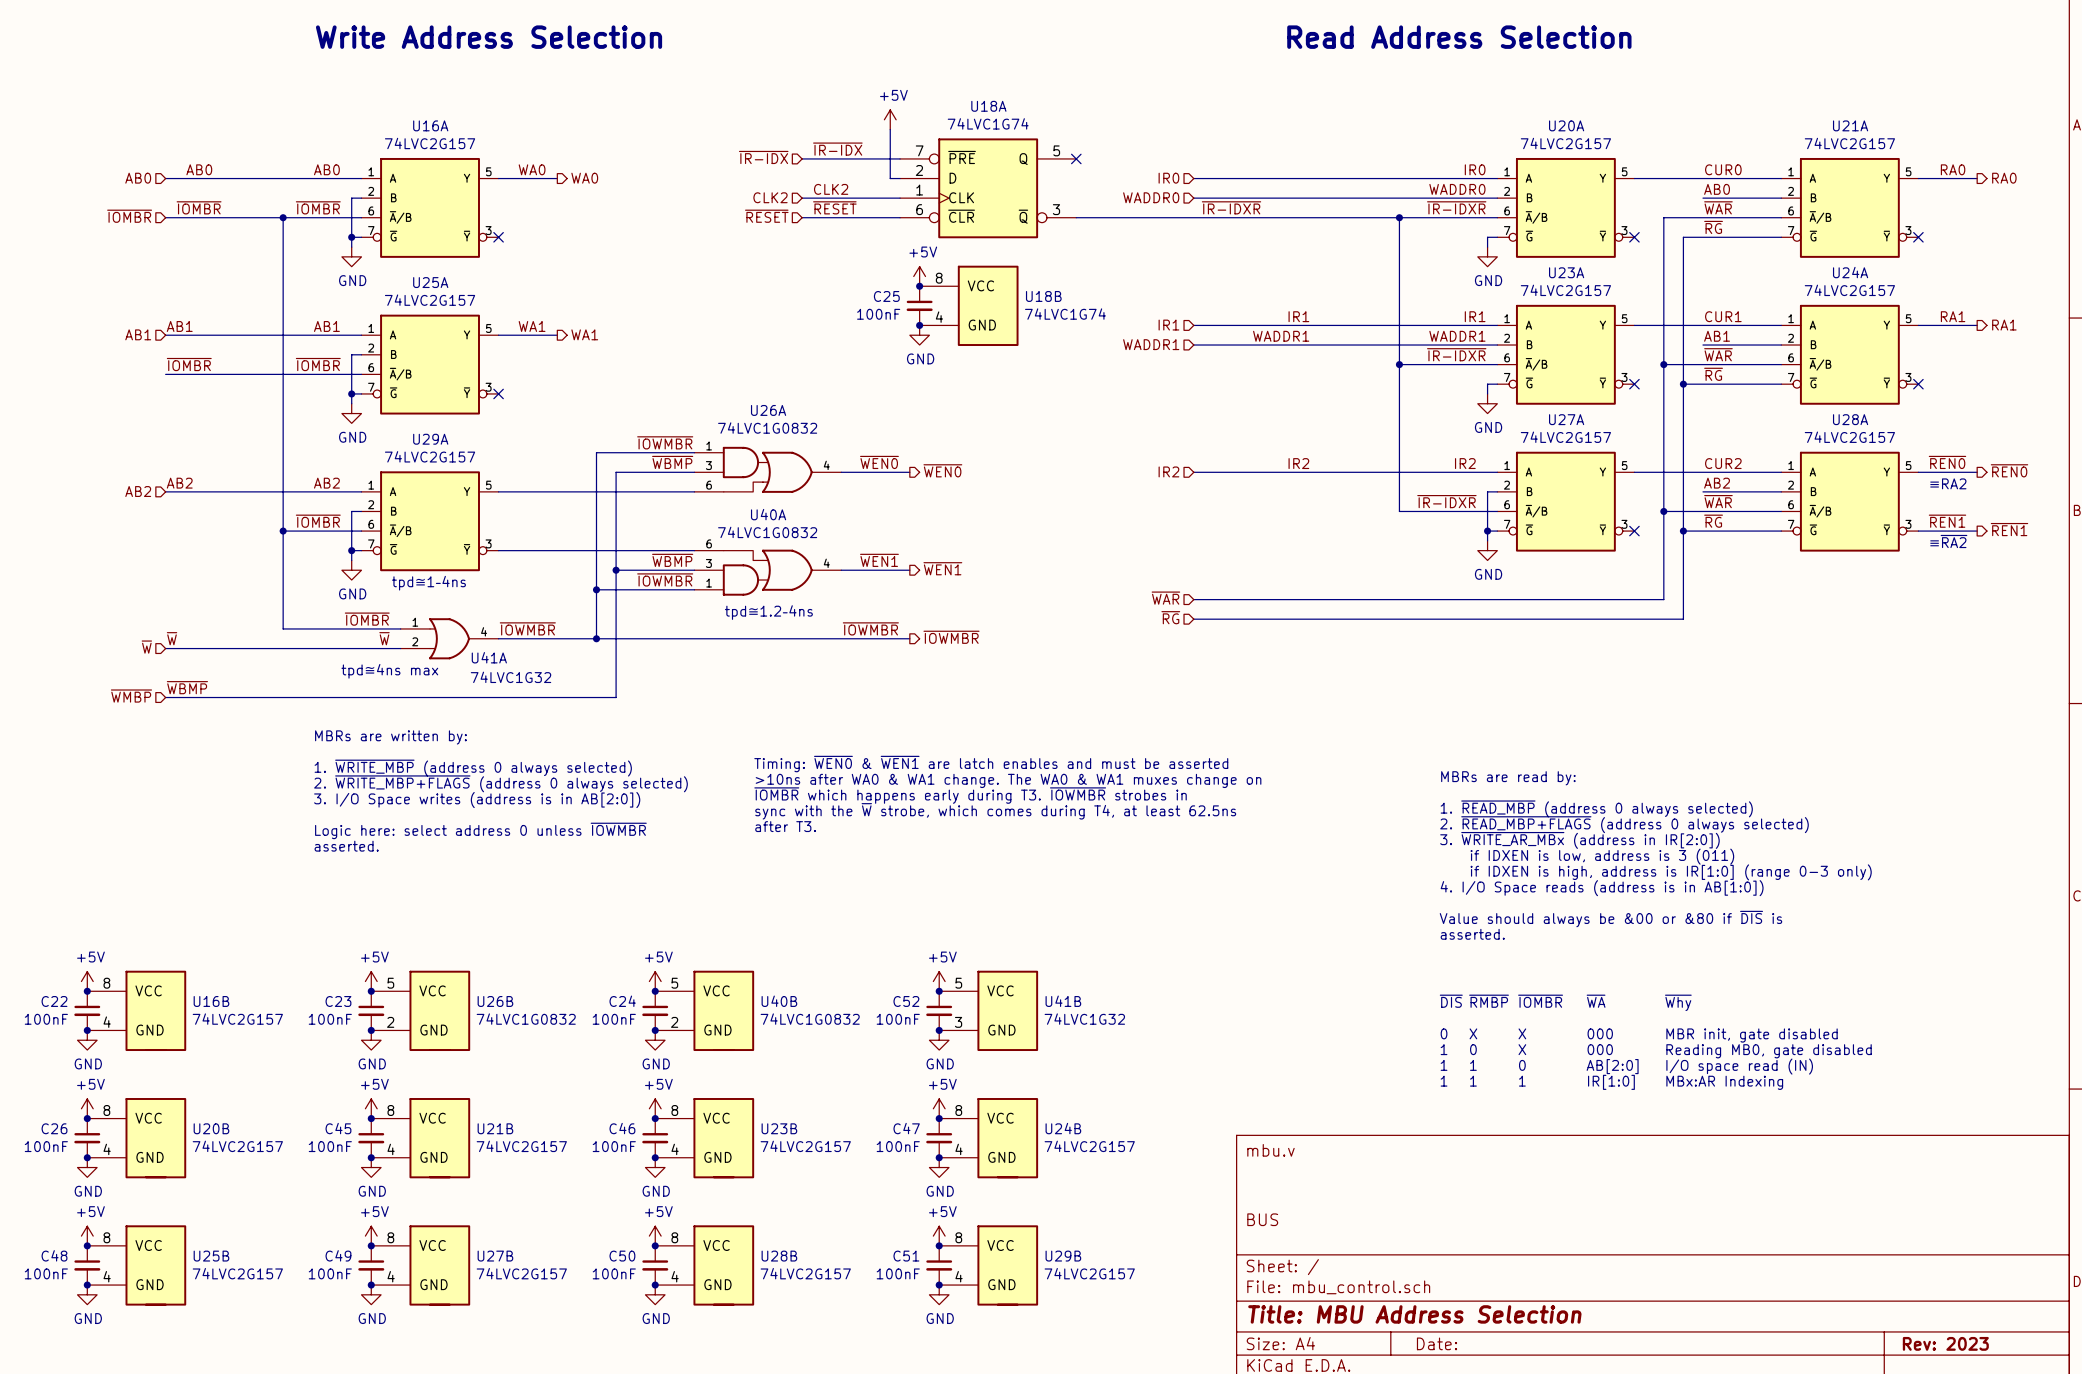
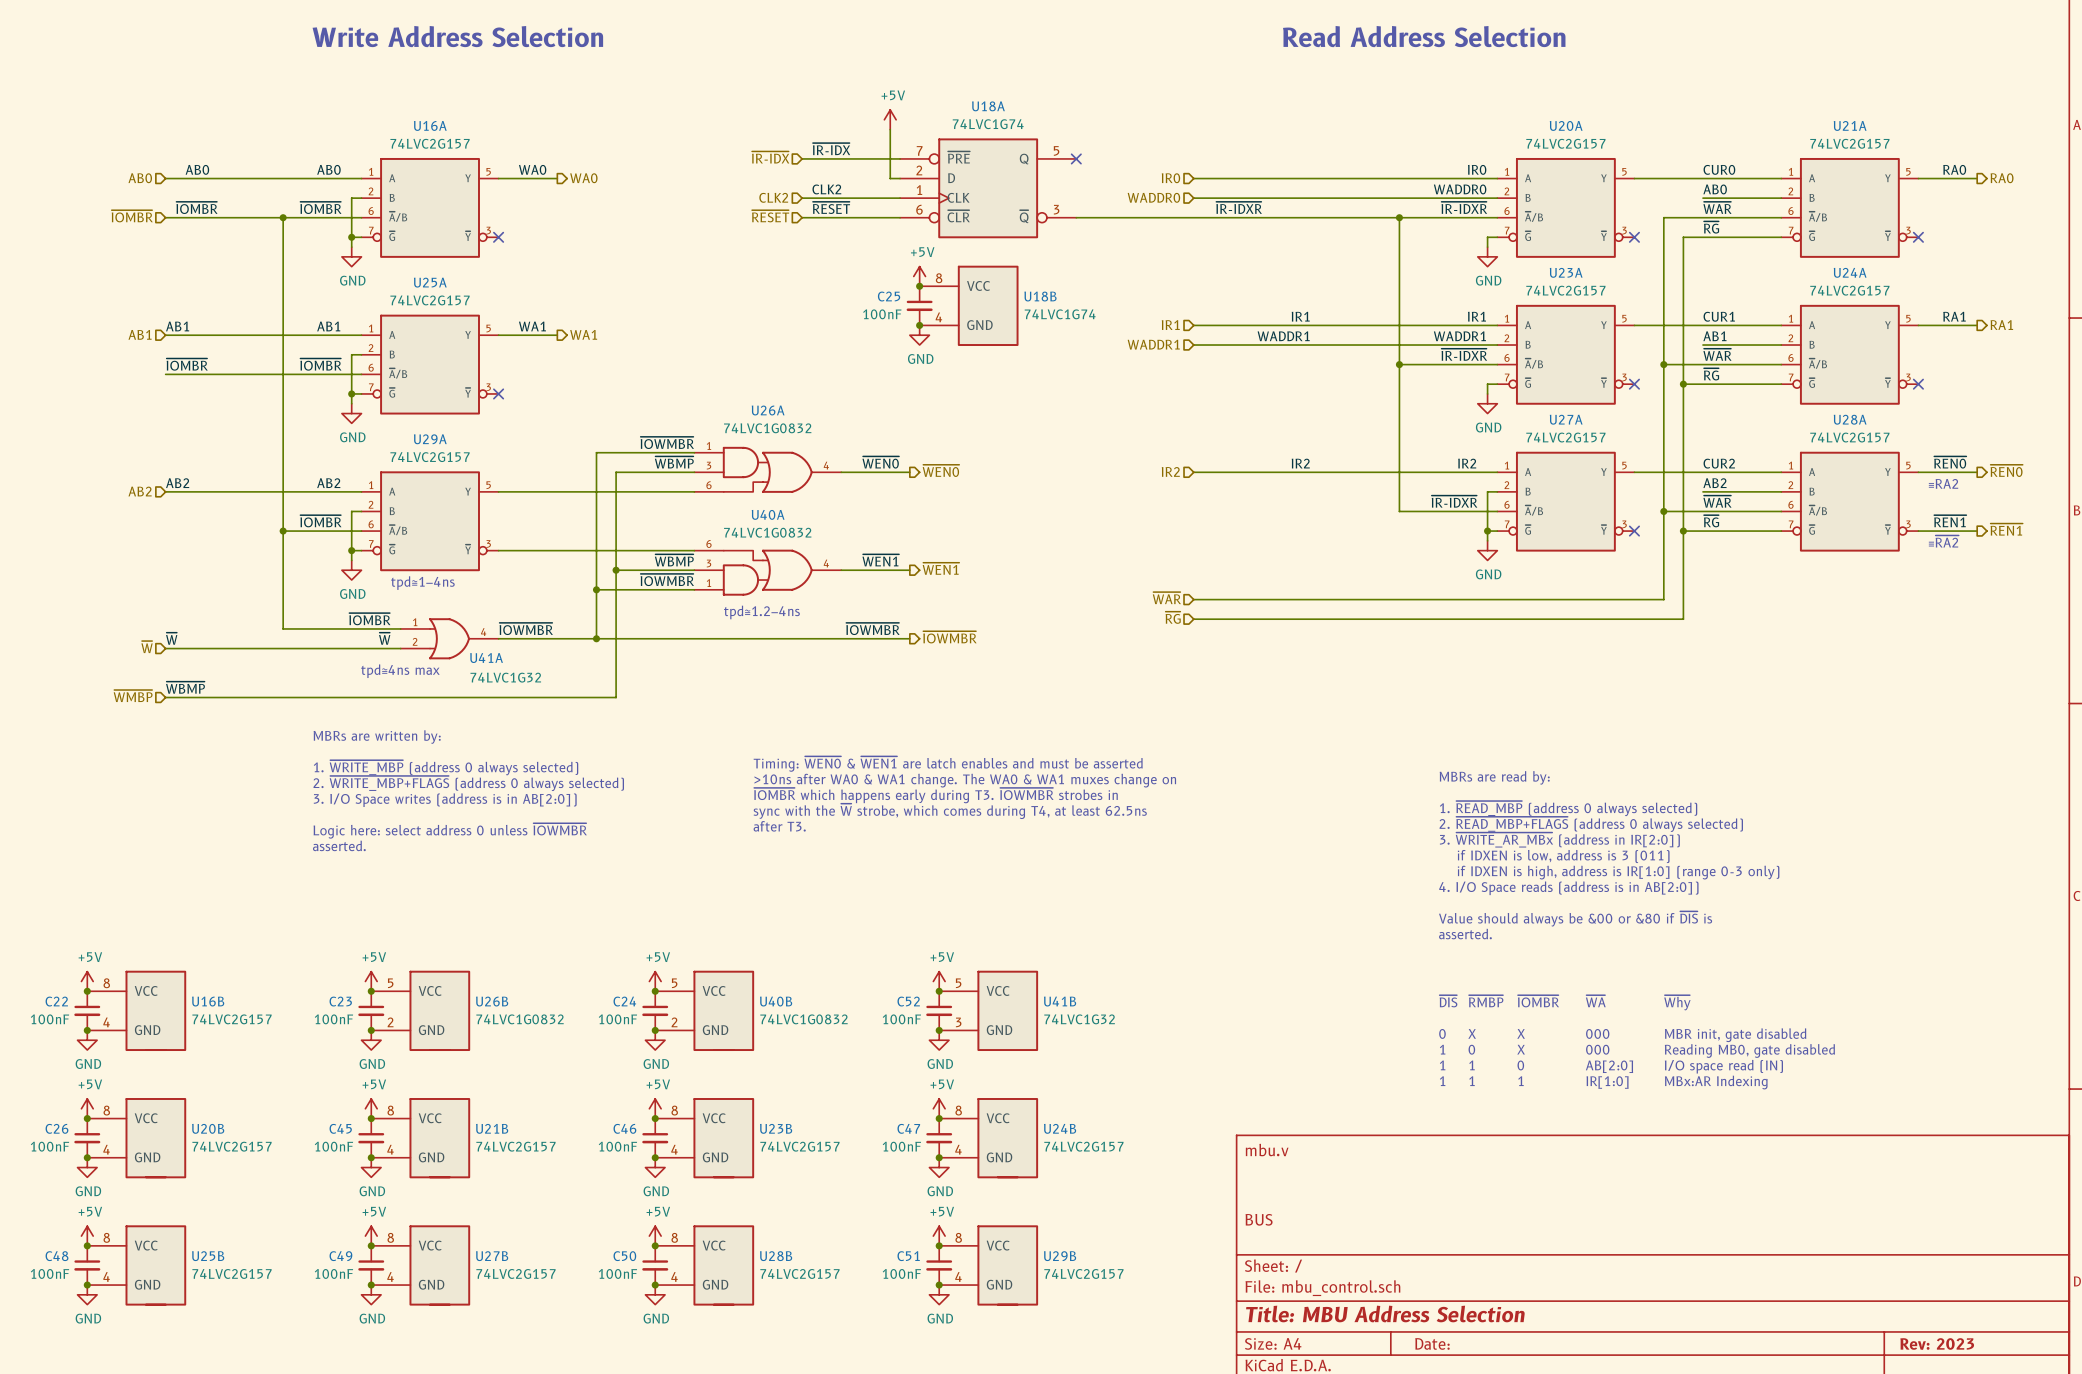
text: 4. I/O Space reads (address is in AB[1:0]) (1602, 888) -> 4. I/O Space reads (address is in AB[2:0]) (1568, 888)

